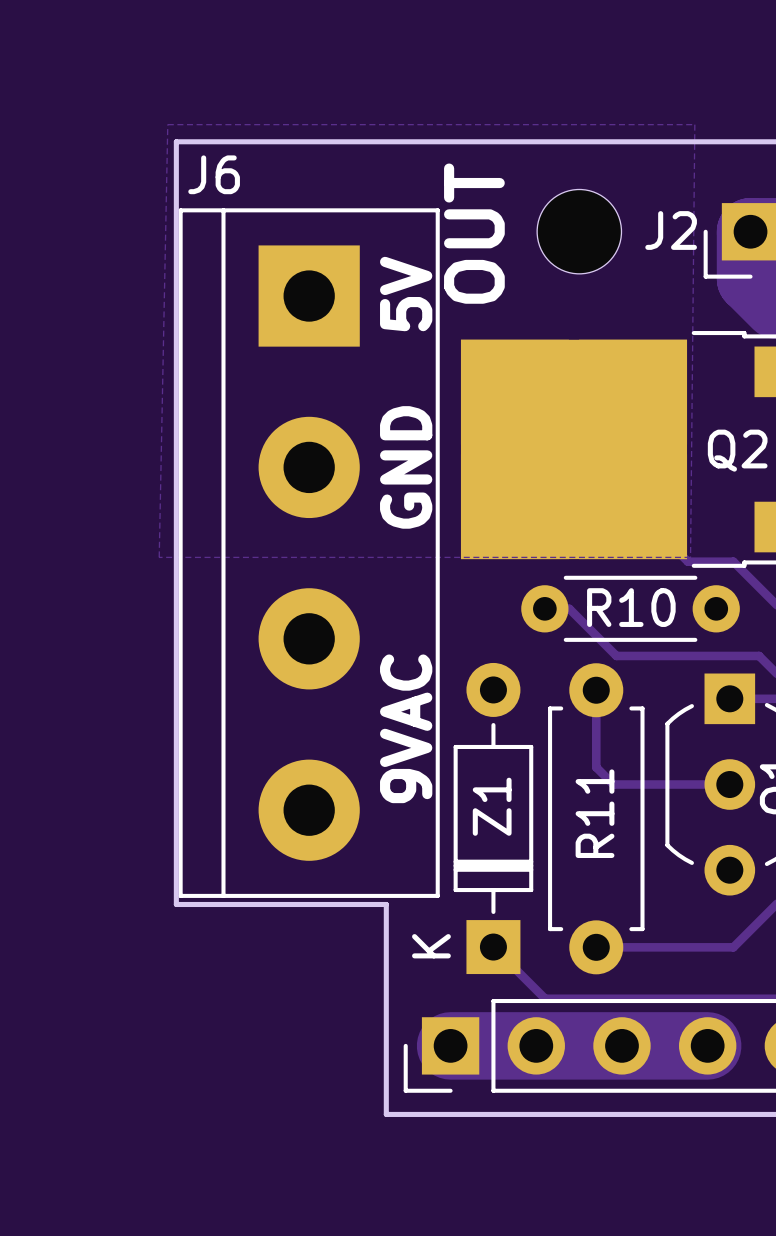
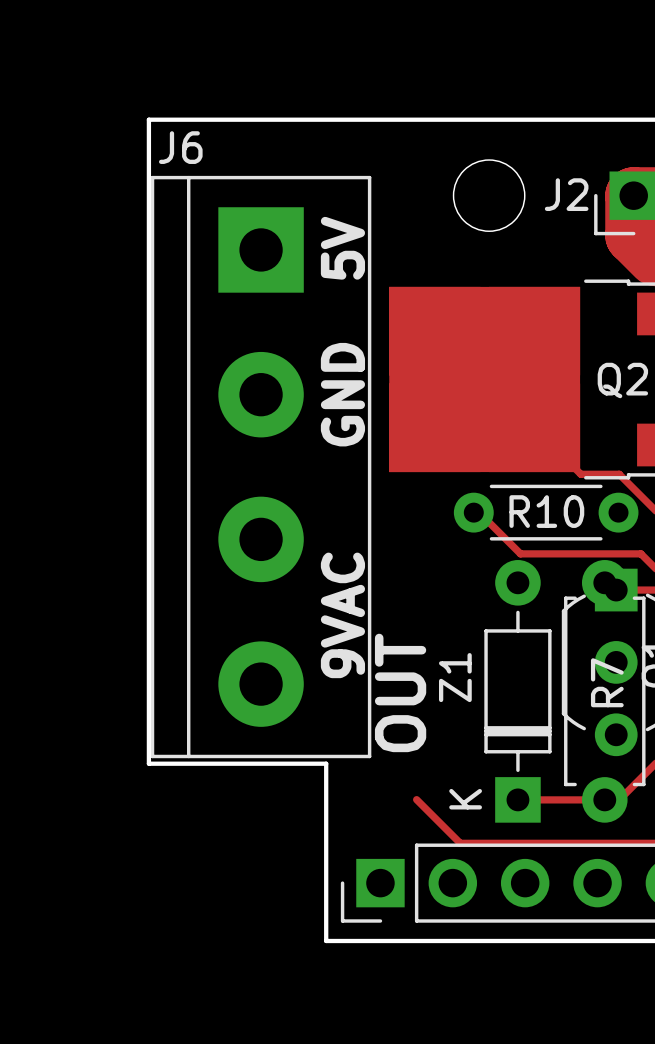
zone outline: (167, 124) (694, 124) (690, 557) (159, 557) (167, 124) -> none
text position: OUT (474, 233) -> OUT (400, 692)
R10 position: (630, 608) -> (546, 512)
track: (596, 690) (596, 767) (613, 784) (729, 784) -> none
Z1 name position: Z1 (492, 806) -> Z1 (455, 677)
Z1 position: (493, 818) -> (517, 691)
R11: (596, 818) -> none
R7: none -> (604, 691)
track: (450, 1045) (707, 1045) -> none

